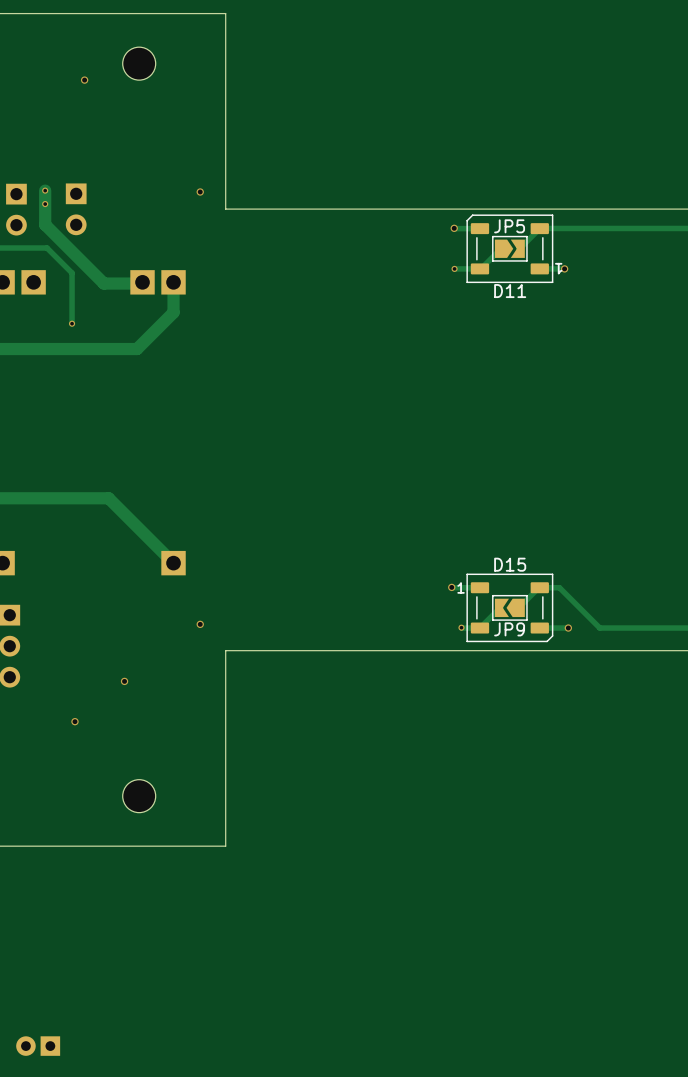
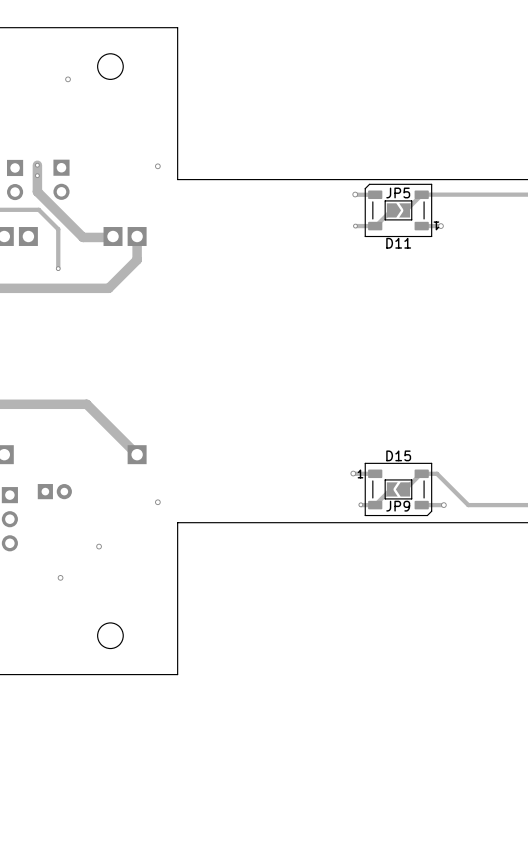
part: none -> (54, 491)
part: (38, 1046) -> none

